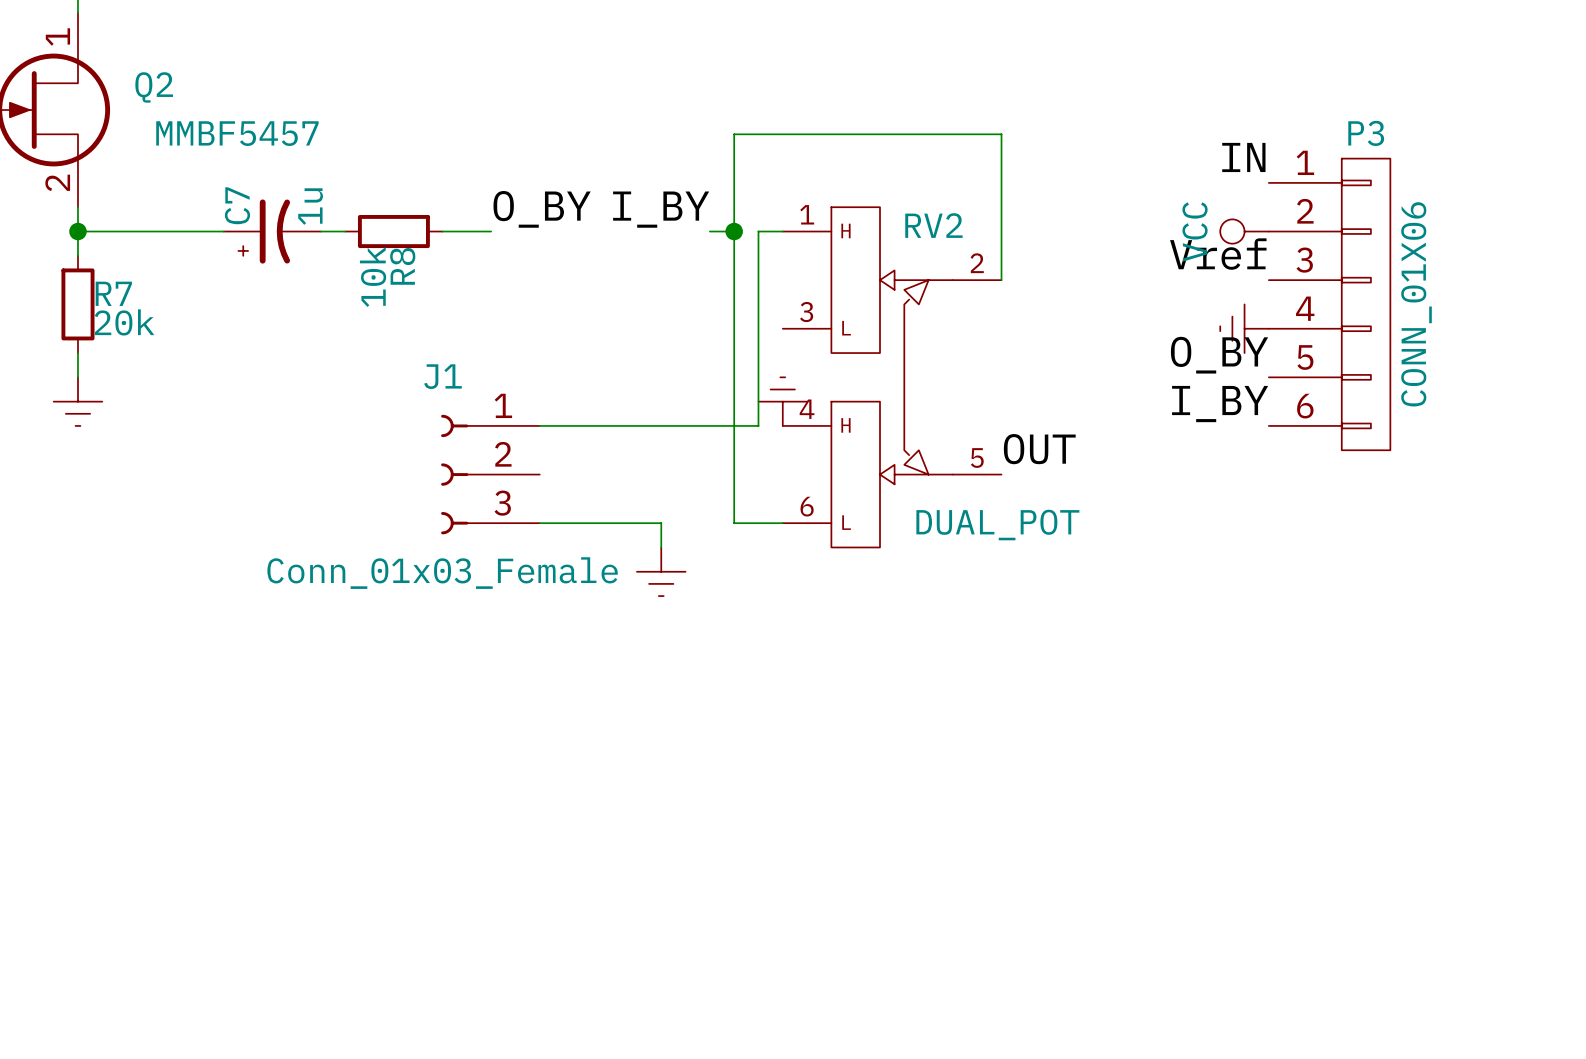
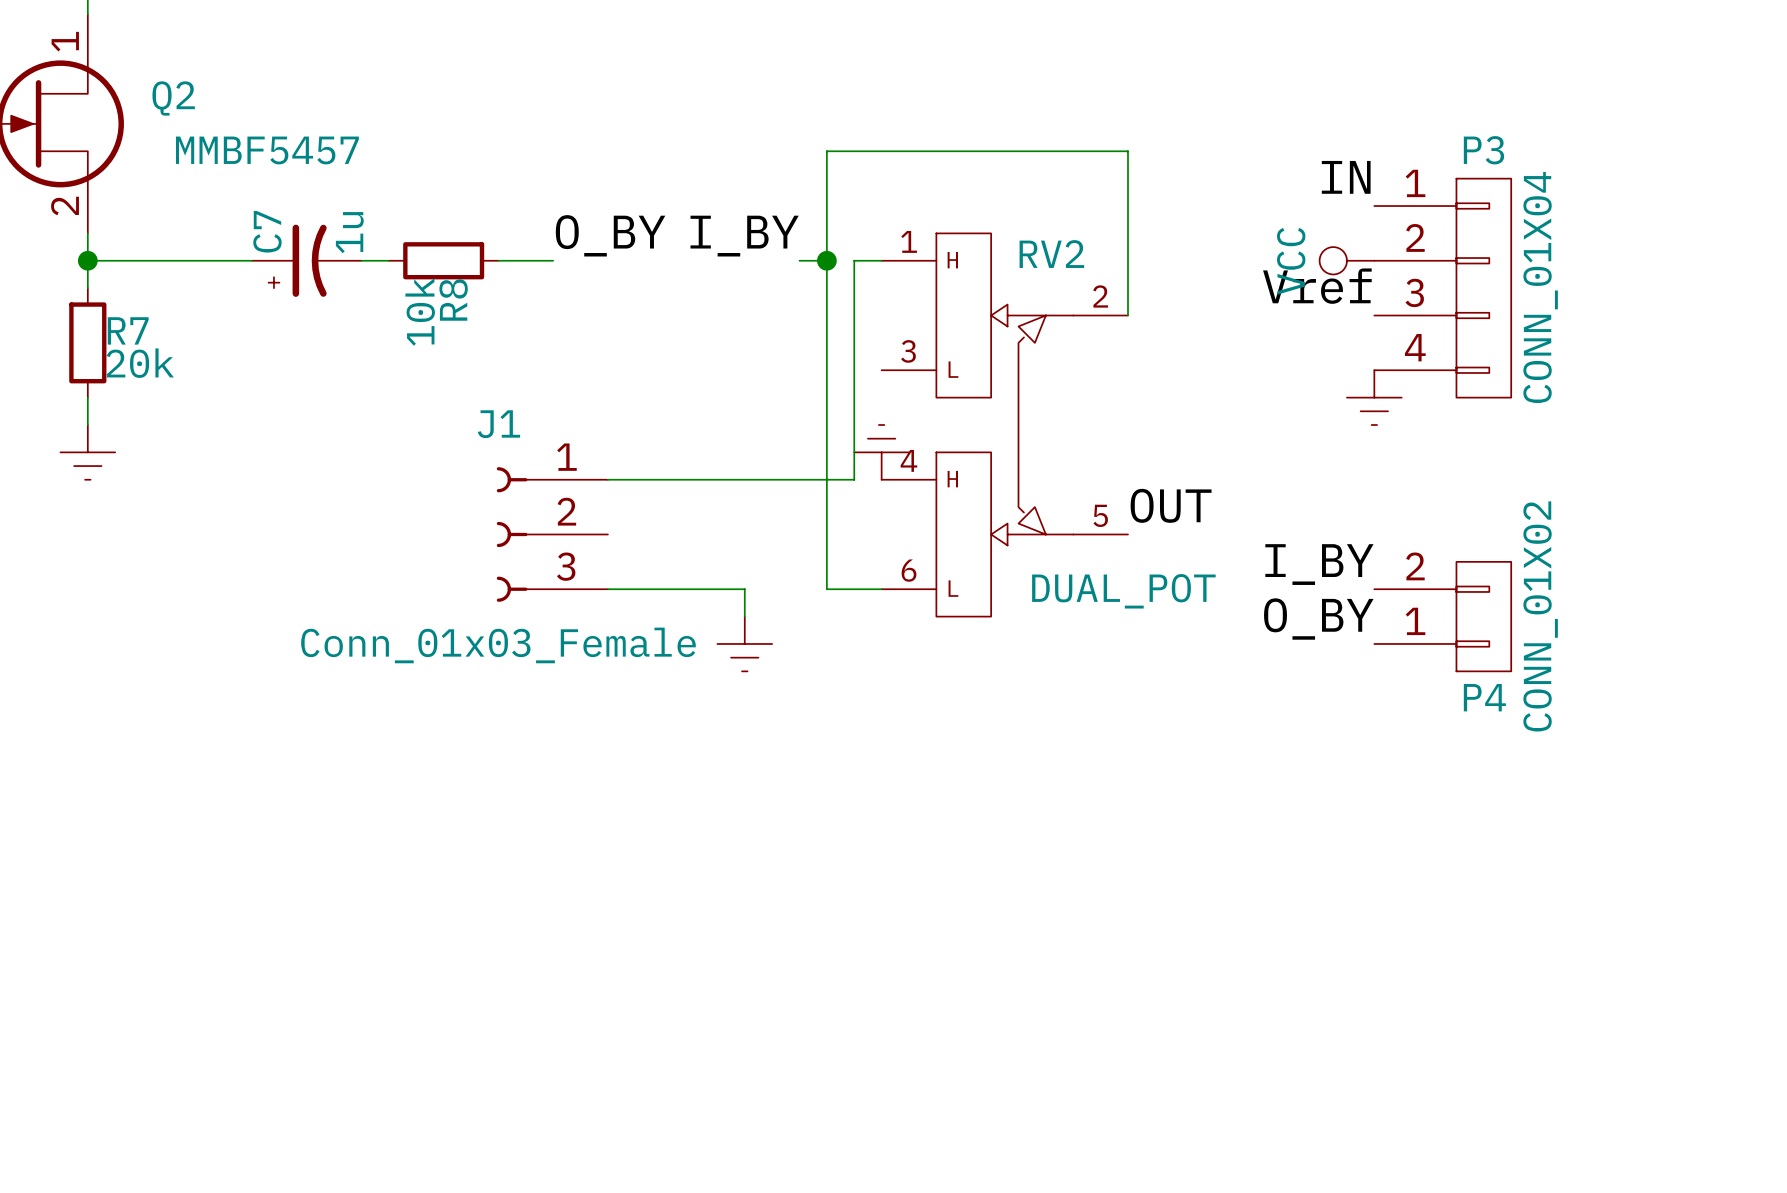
P3 name position: P3 (1366, 133) -> P3 (1483, 150)
label position: IN (1243, 157) -> IN (1346, 177)
P3 symbol: [1268, 158, 1391, 451] -> [1374, 178, 1512, 398]
power symbol position: VCC (1244, 231) -> VCC (1346, 260)
label position: Vref (1218, 254) -> Vref (1317, 286)
P3 value: CONN_01X06 (1416, 304) -> CONN_01X04 (1540, 287)
power symbol rotation: 0° (1244, 328) -> 90° counterclockwise (1374, 397)
power symbol position: (1244, 328) -> (1374, 397)
label position: O_BY (1219, 355) -> O_BY (1318, 619)
label position: I_BY (1220, 404) -> I_BY (1319, 564)
P4: none -> CONN_01X02 (1442, 616)

